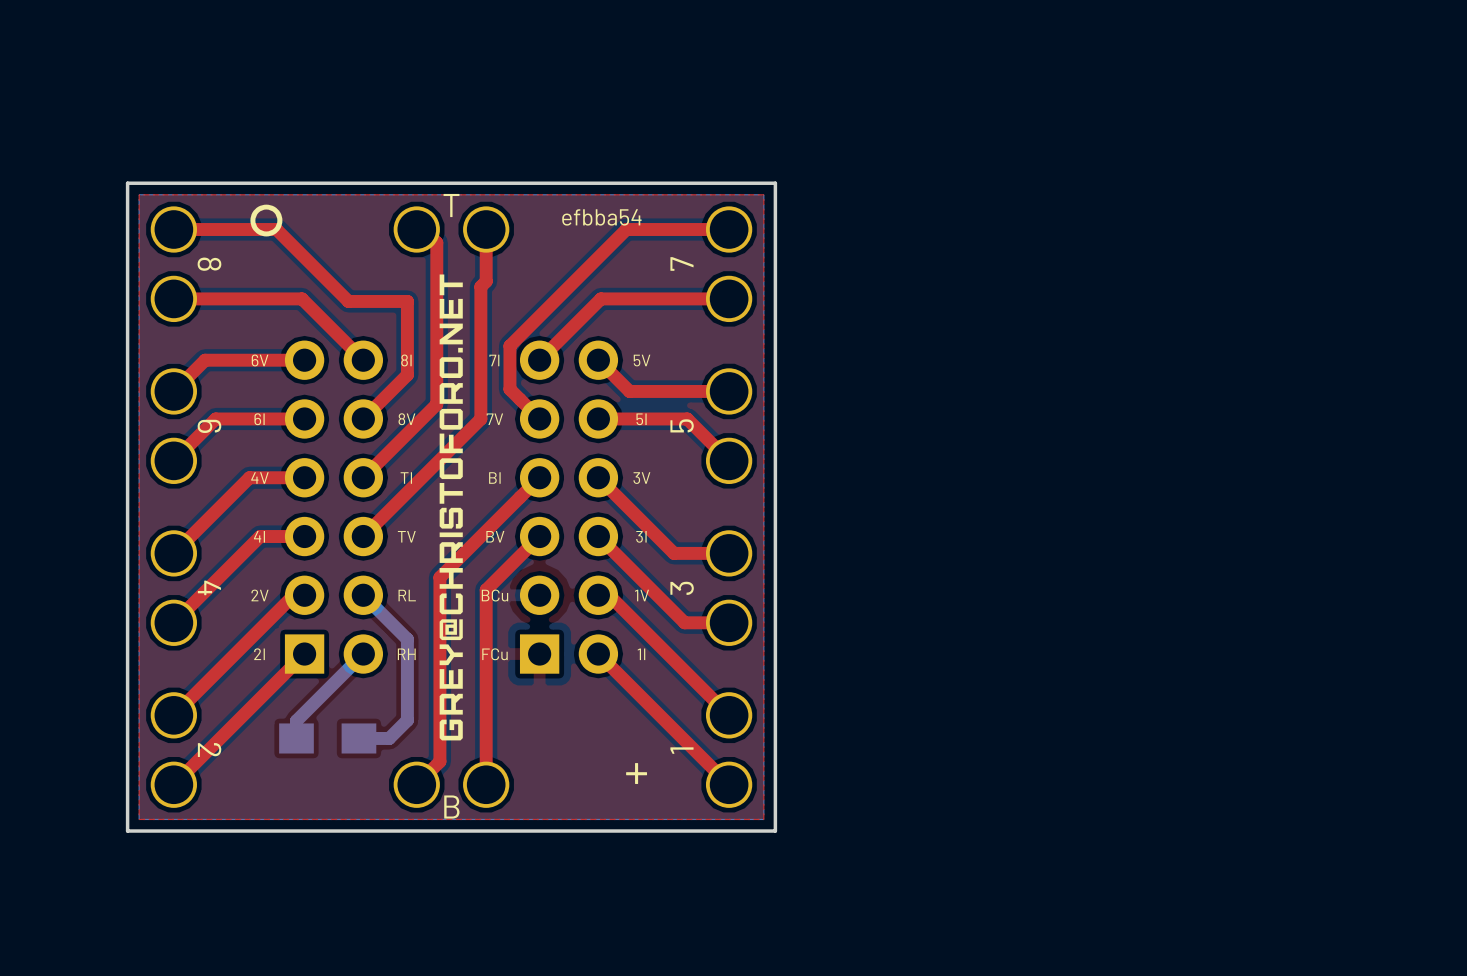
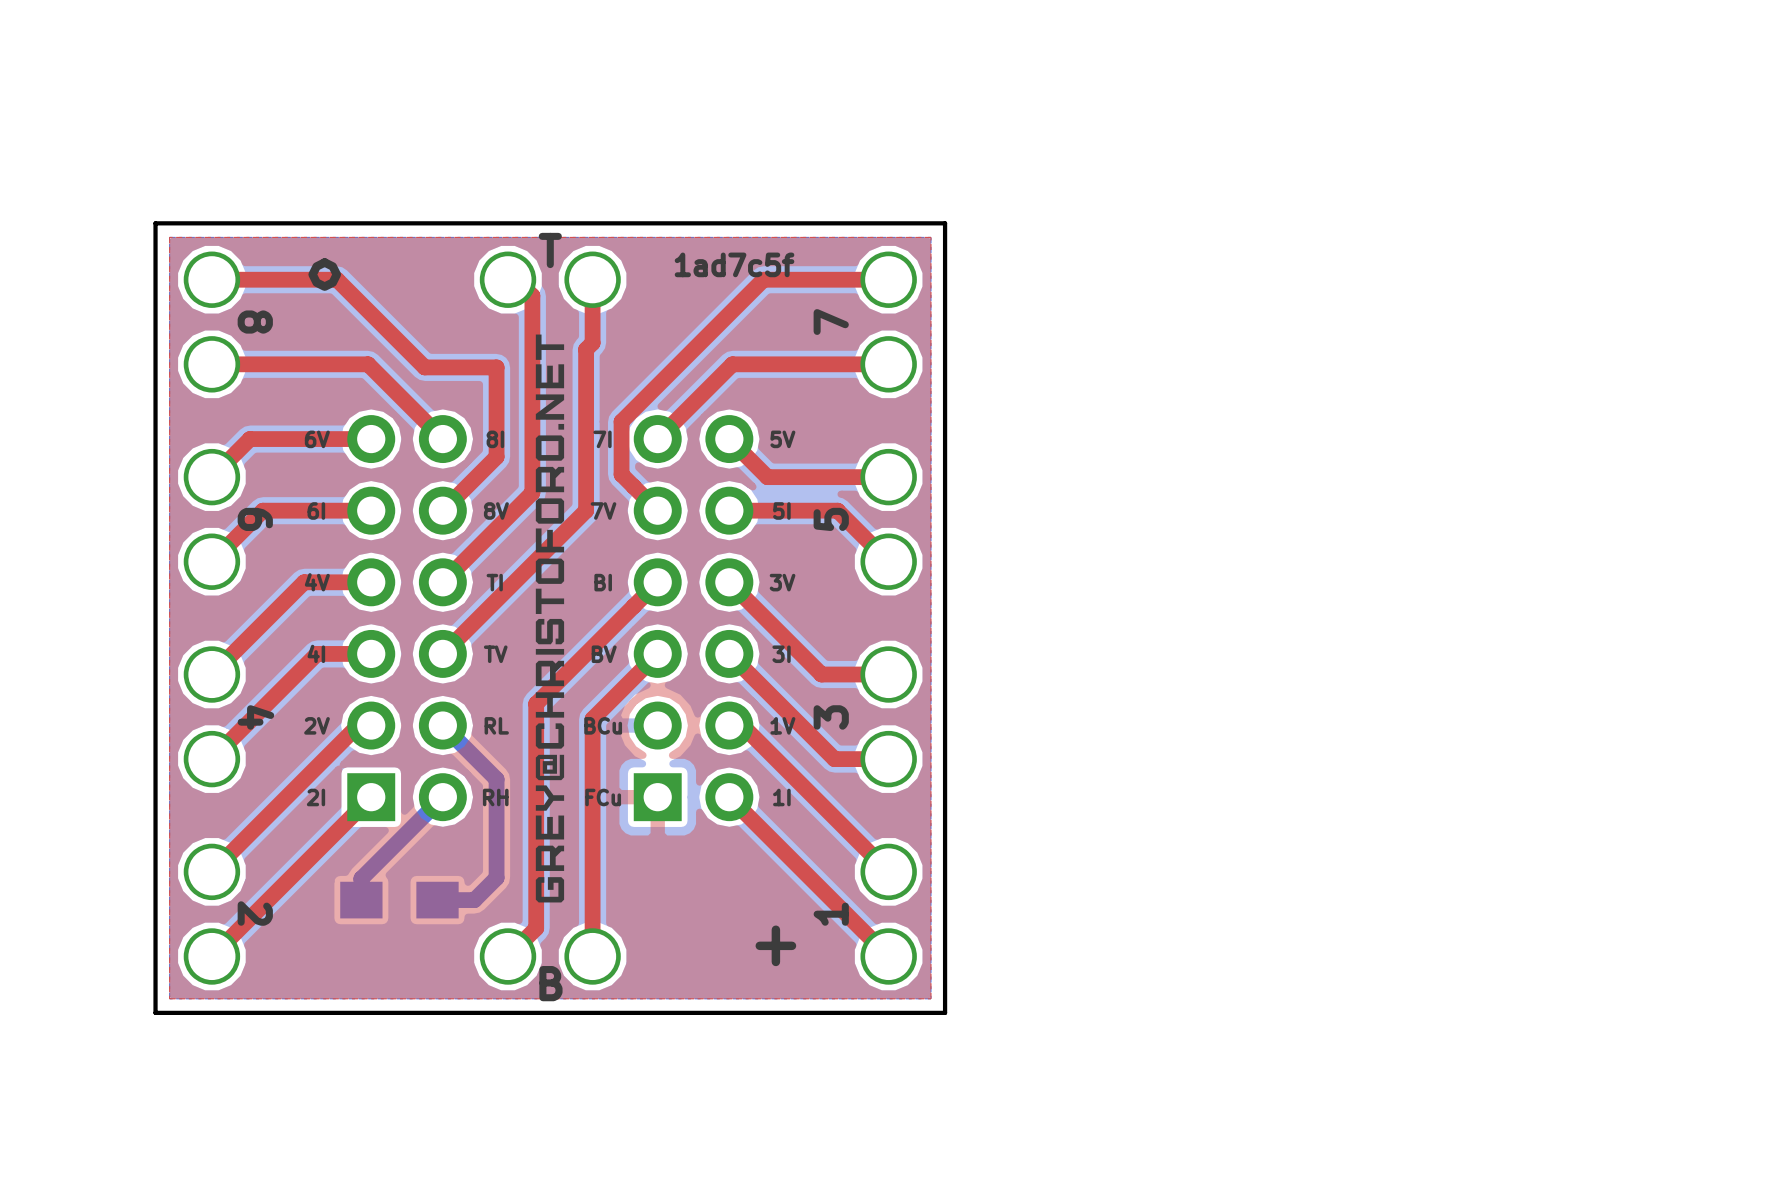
text: efbba54 (601, 217) -> 1ad7c5f (734, 264)

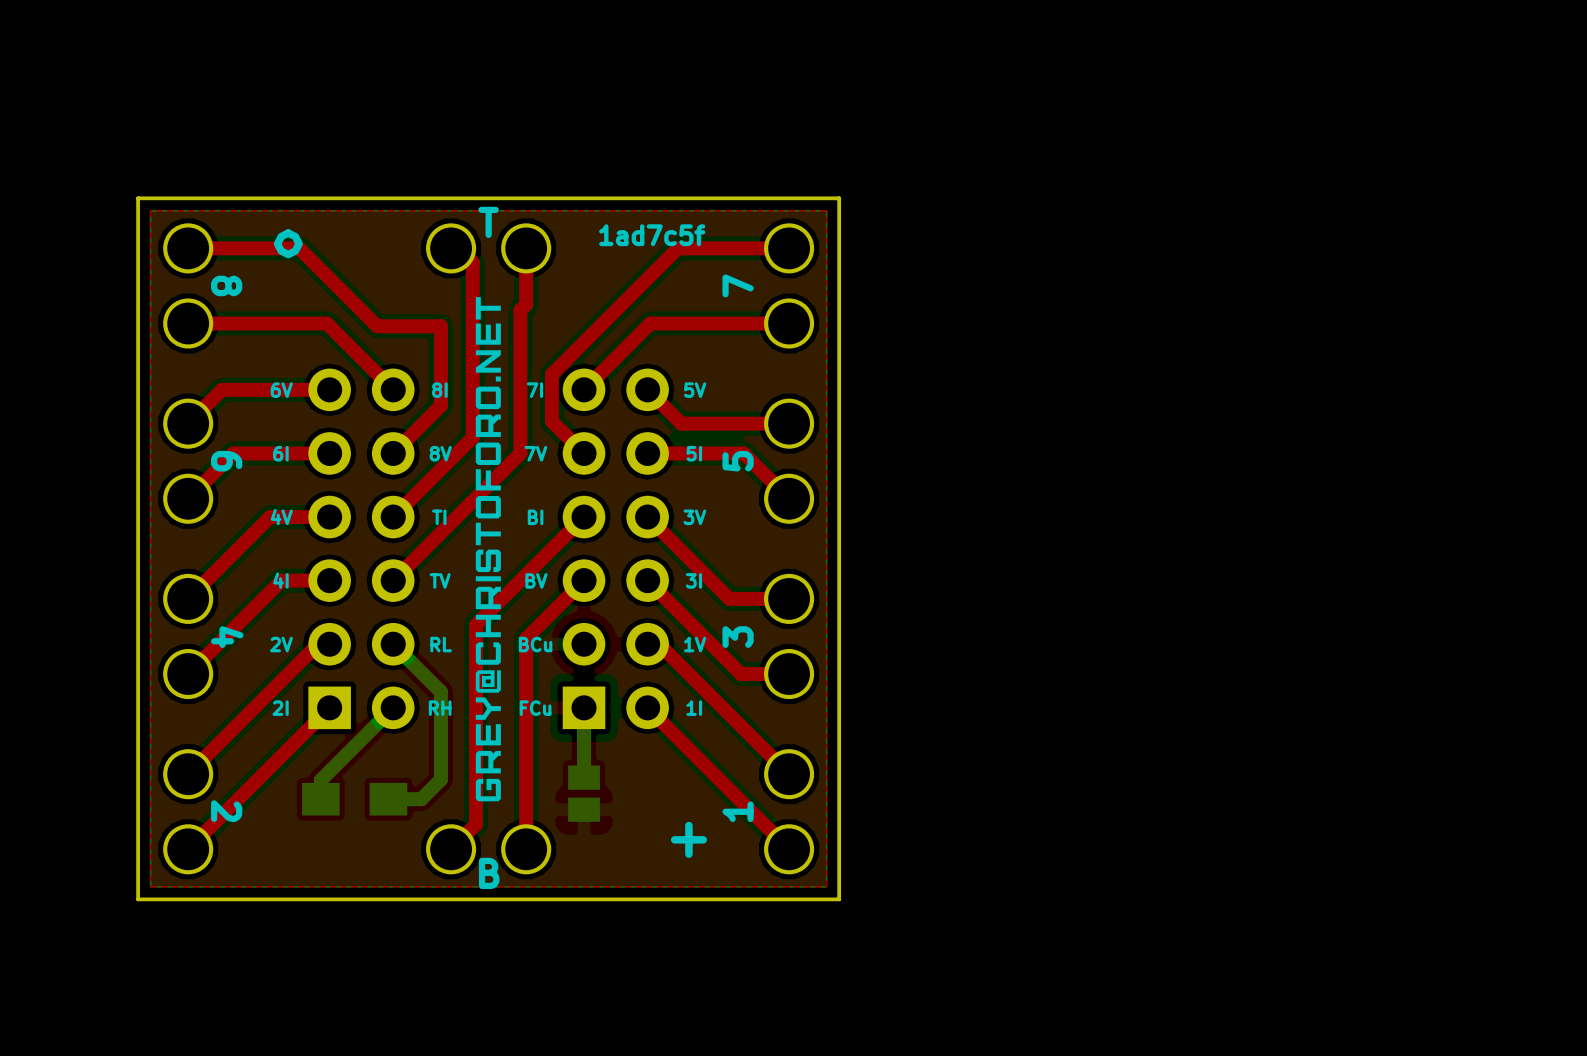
bottom track: none -> (584, 707) (584, 777)
part: none -> (584, 793)

